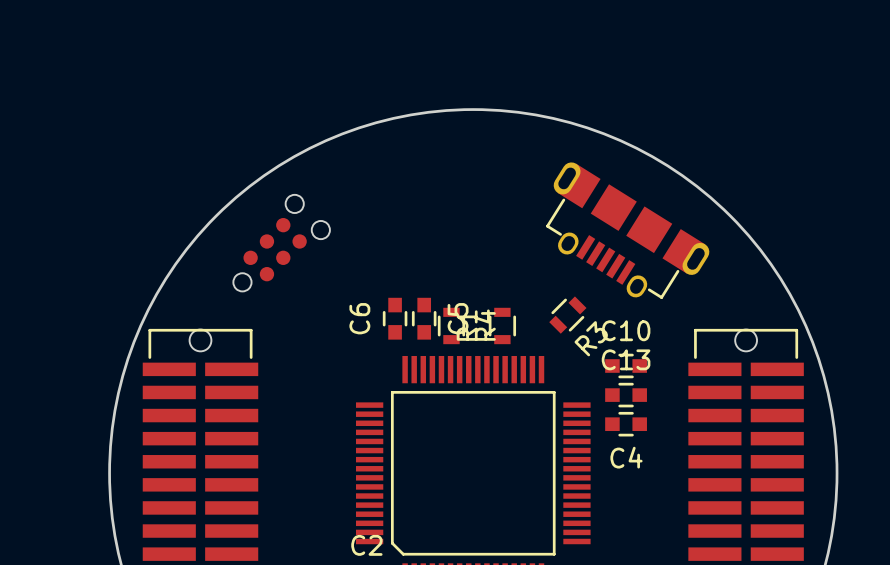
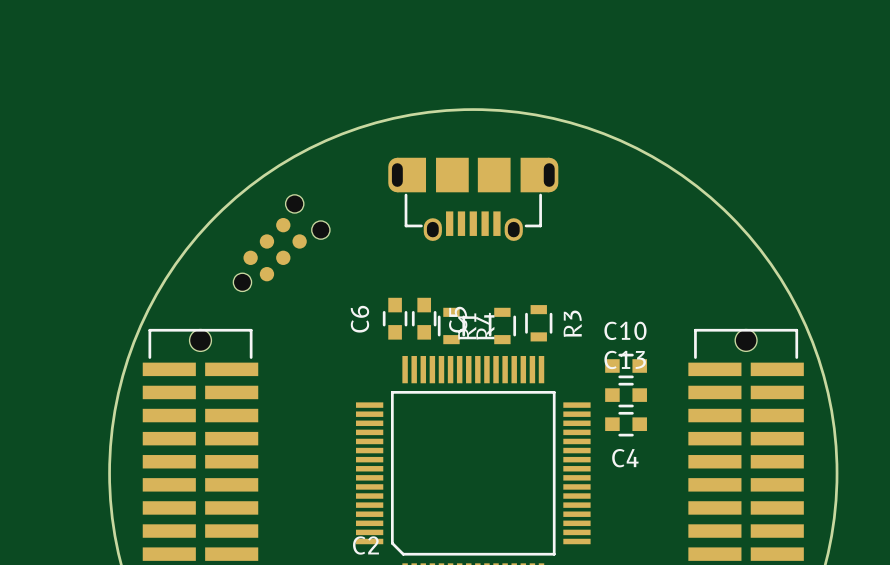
part: none -> (473, 199)
part: (627, 230) -> none
R3 rotation: 0° (567, 315) -> 45° counterclockwise (538, 323)
R3 position: (567, 315) -> (538, 323)

